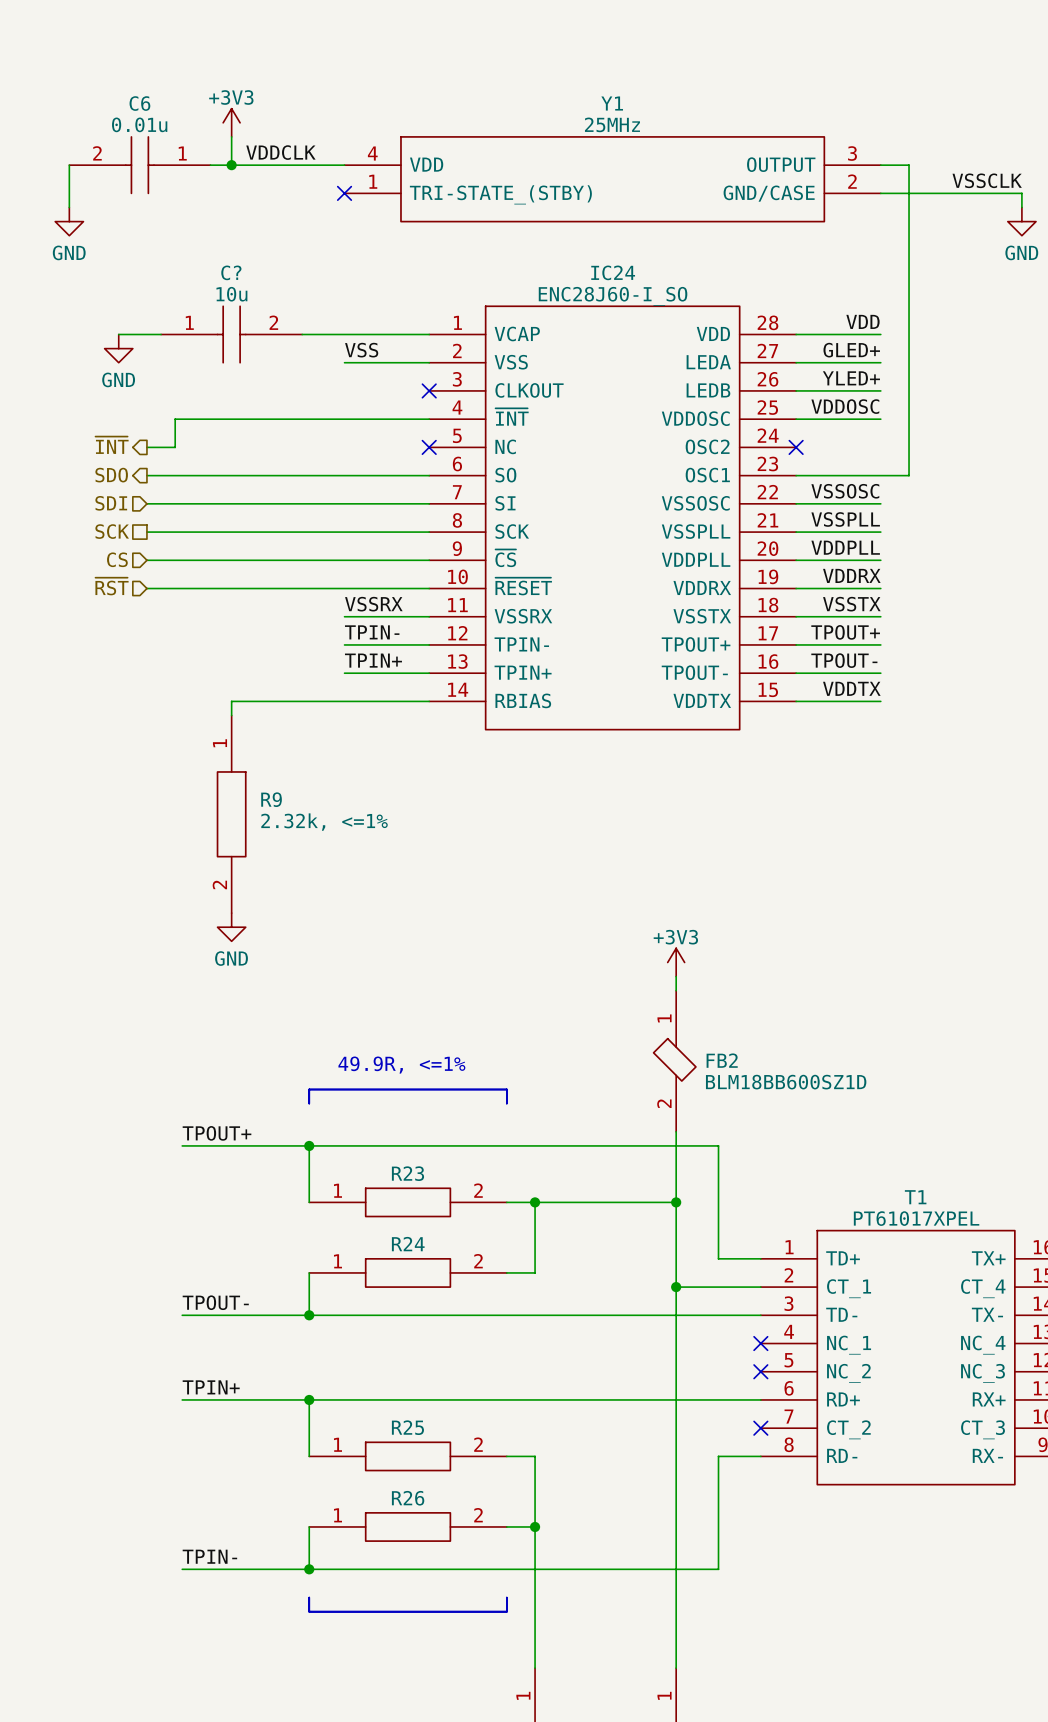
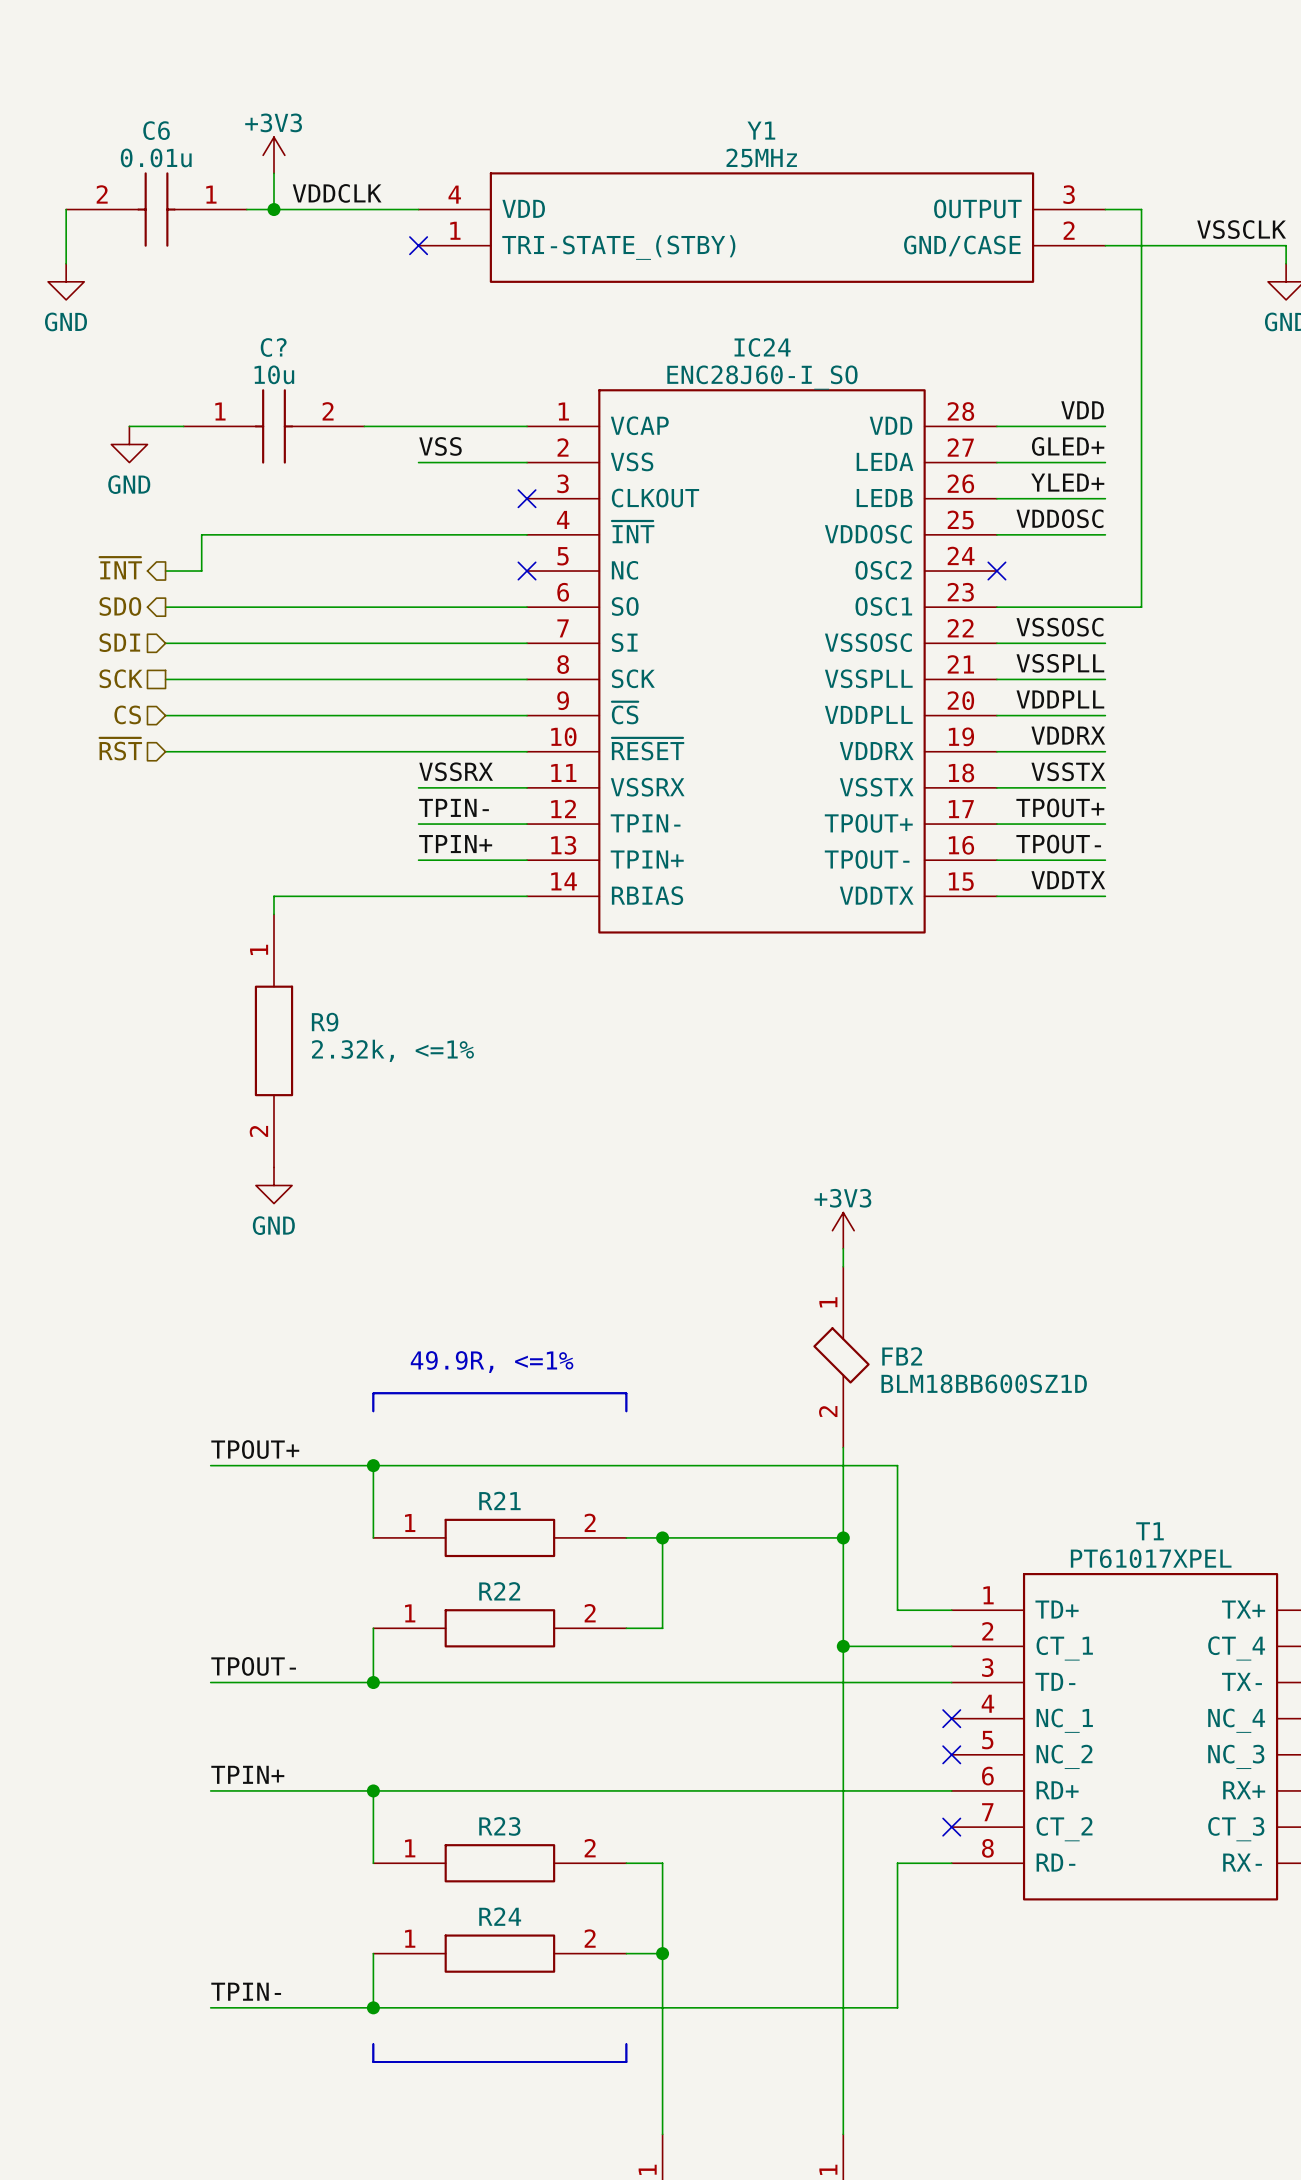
R23 name: R23 (407, 1173) -> R21 (499, 1500)
R24 name: R24 (408, 1244) -> R22 (499, 1591)
R25 name: R25 (407, 1427) -> R23 (499, 1826)
R26 name: R26 (408, 1498) -> R24 (500, 1916)

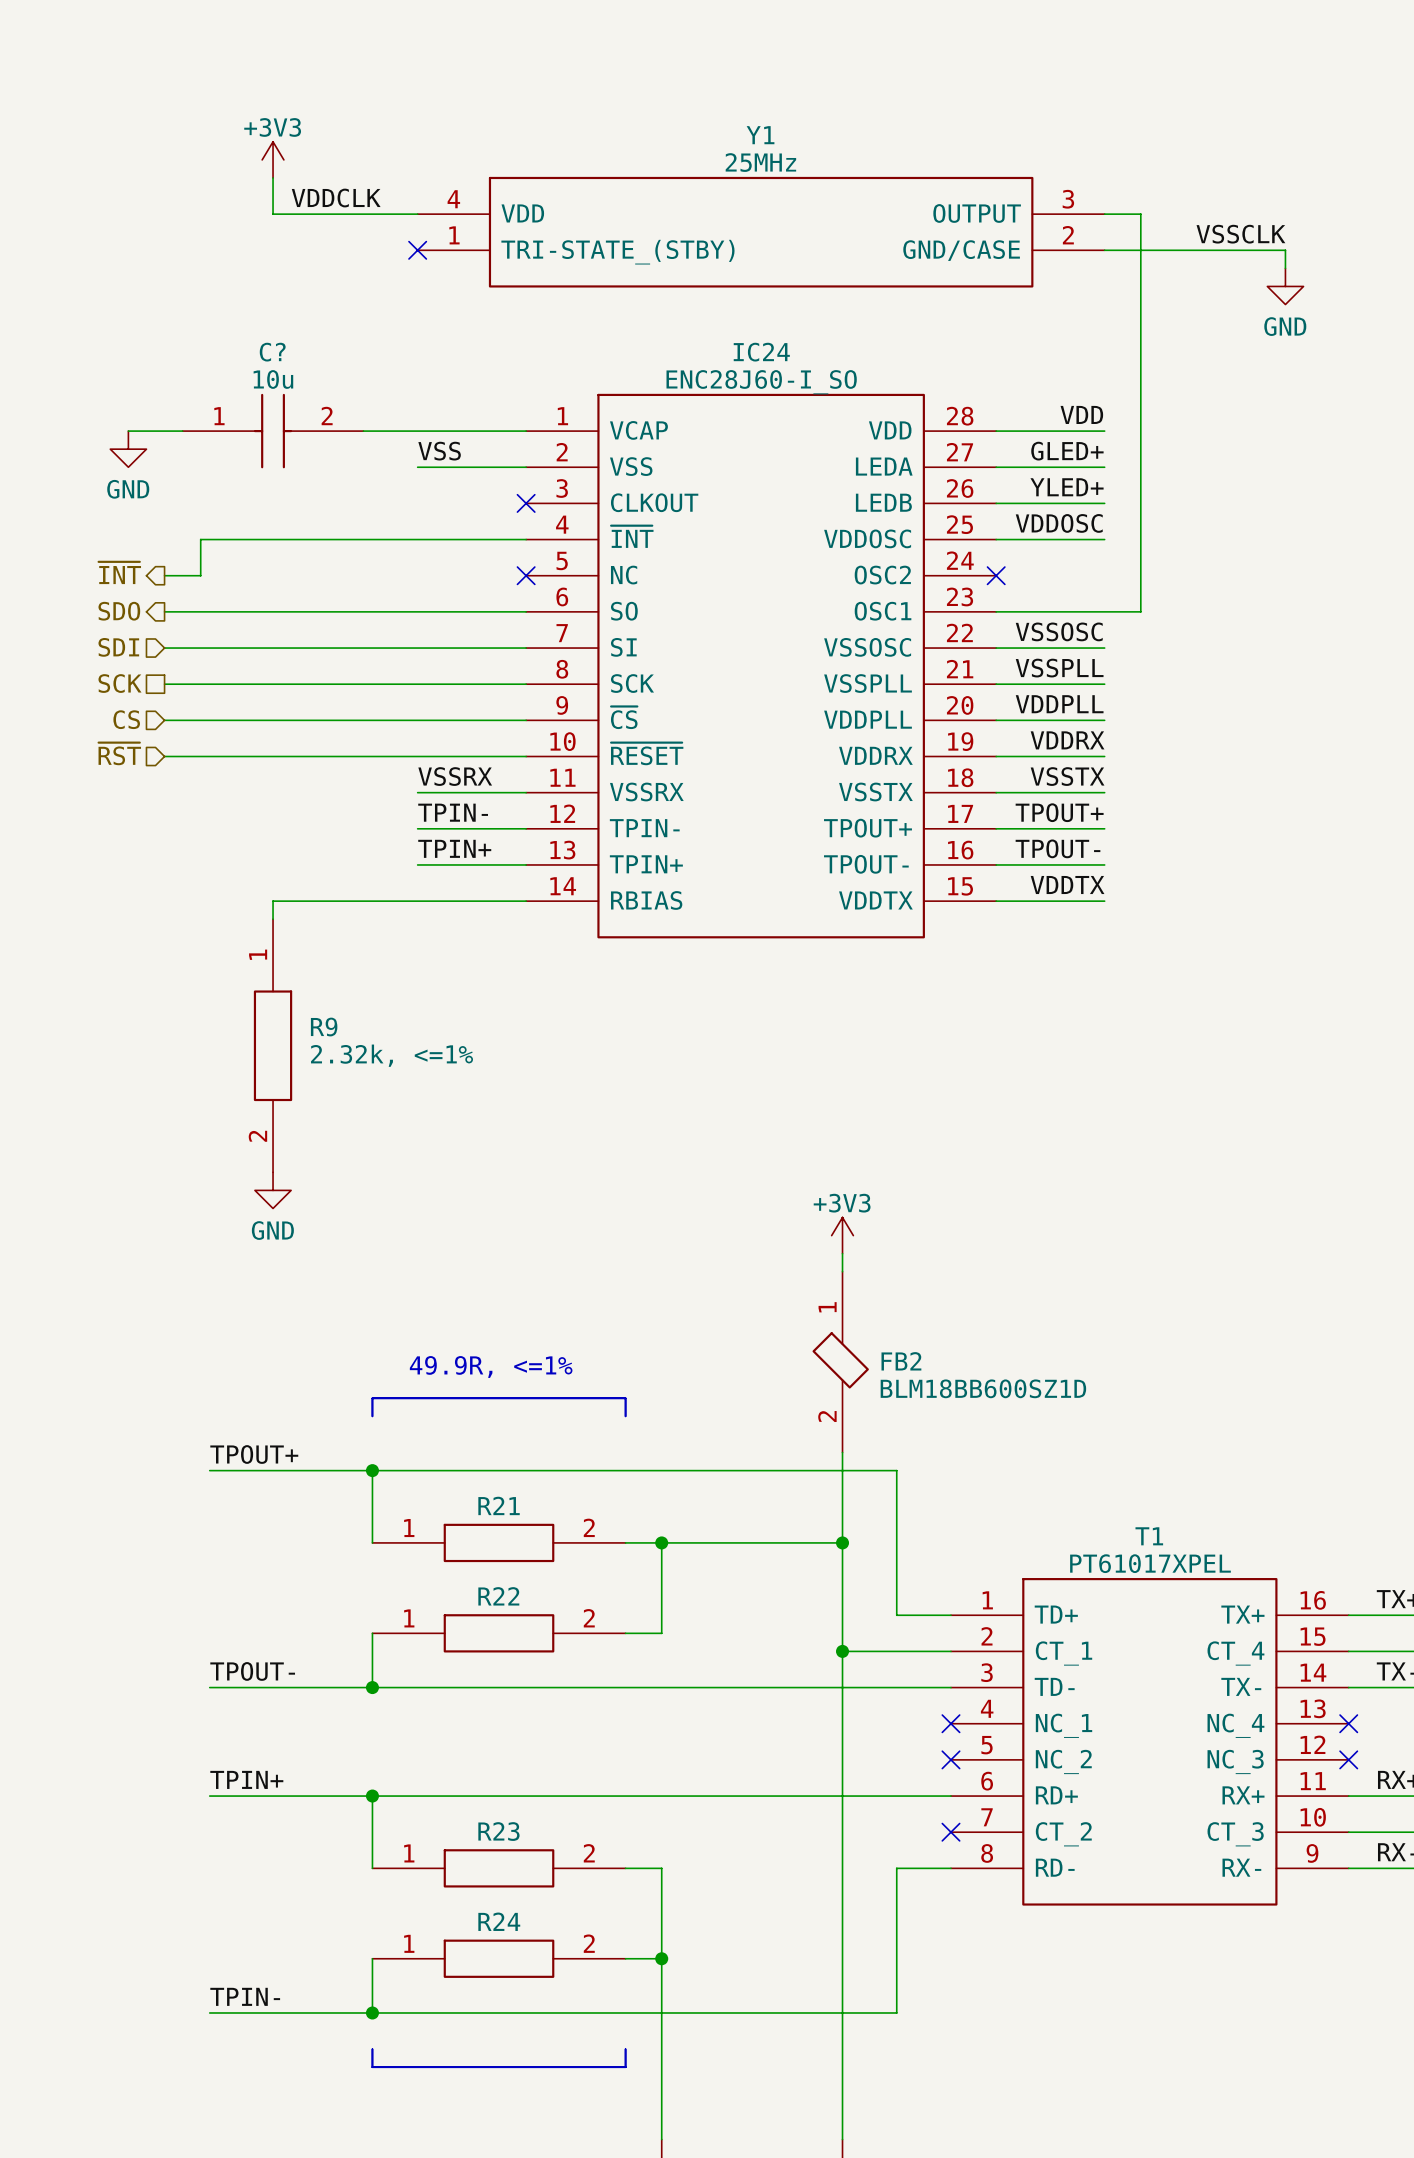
wire: (66, 209) (66, 263) -> none
C6: 0.01u (156, 209) -> none
wire: (246, 209) (273, 209) -> none
junction: (273, 209) -> none
power symbol: GND (66, 281) -> none

